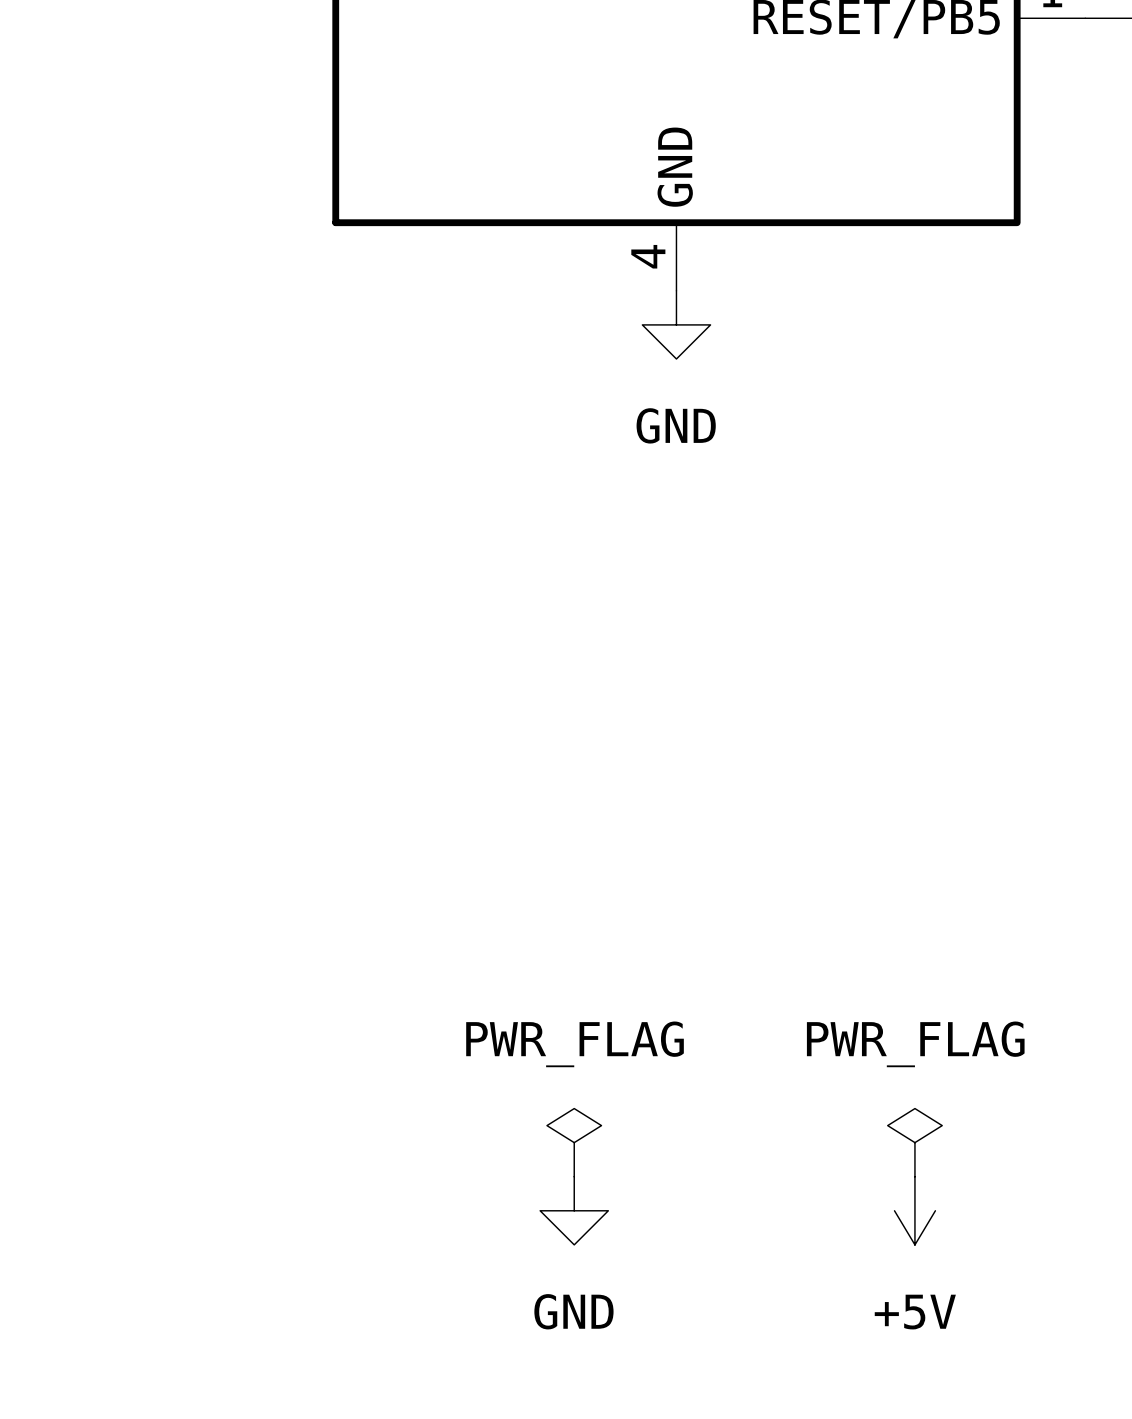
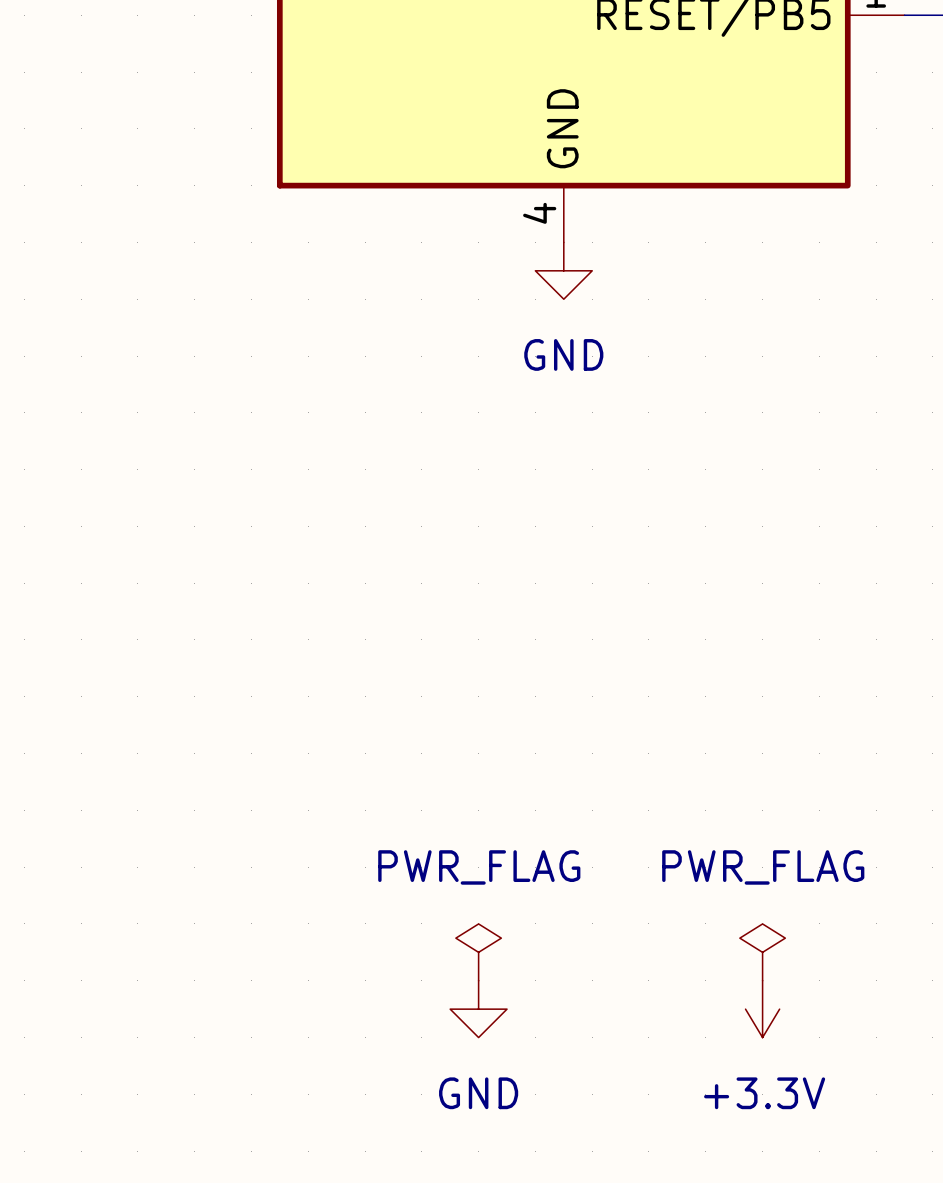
power symbol: +5V (914, 1210) -> +3.3V (762, 1009)

